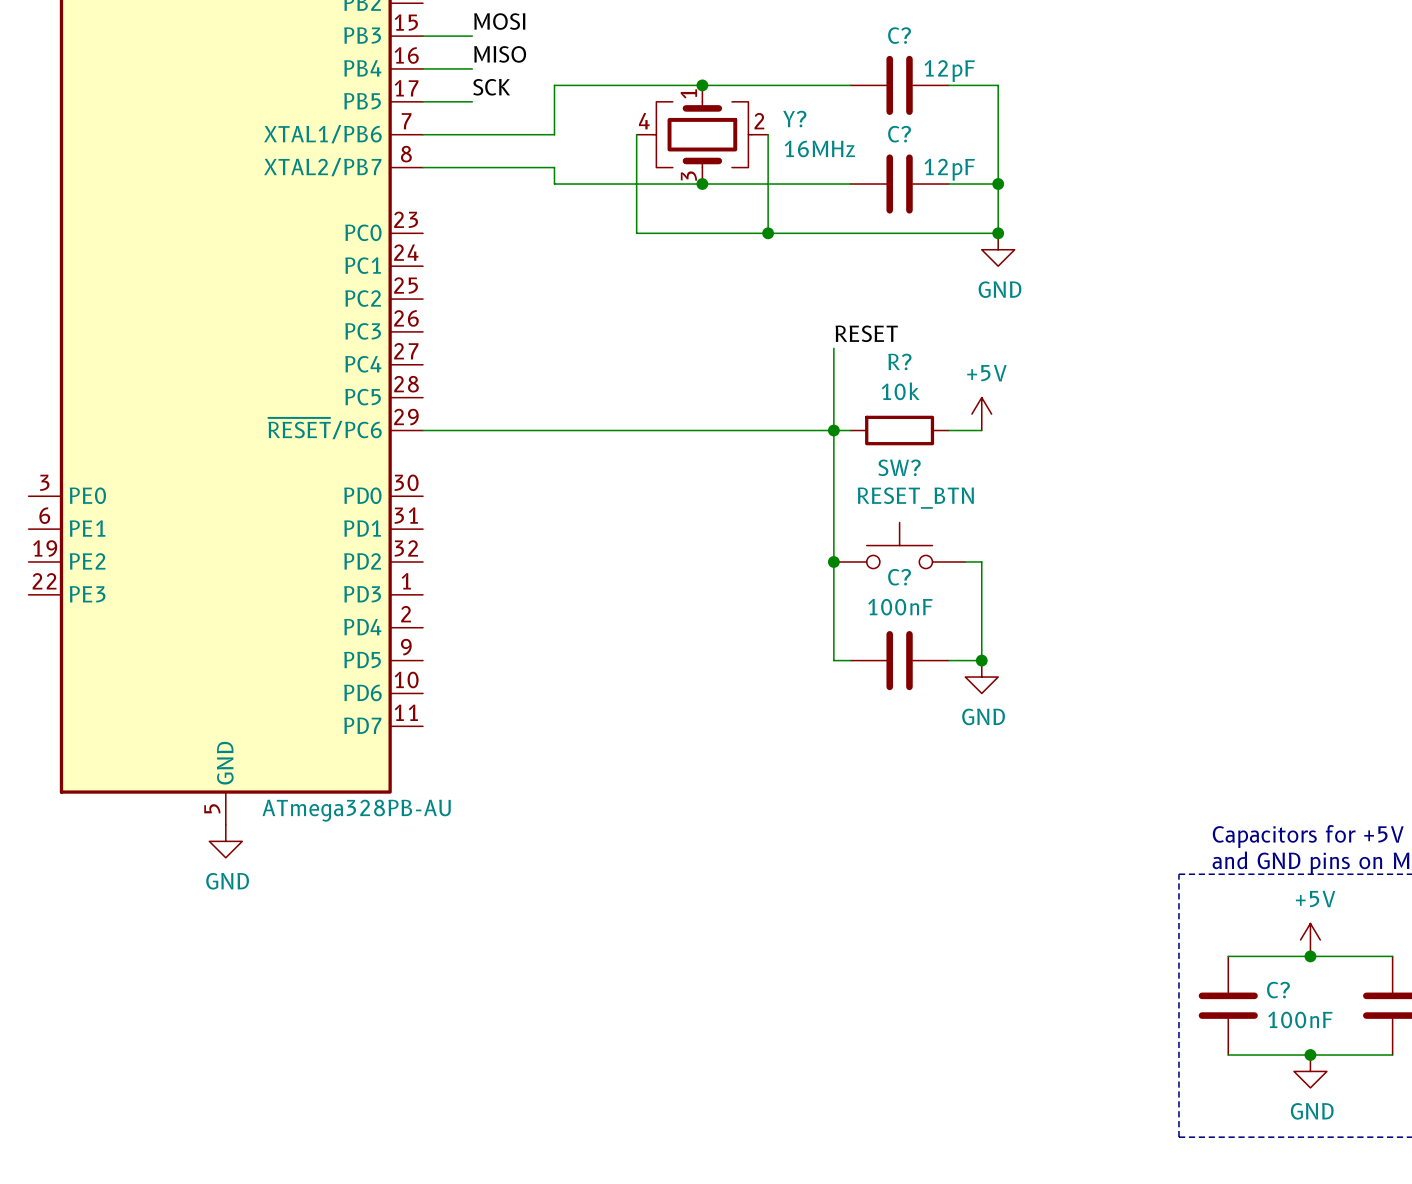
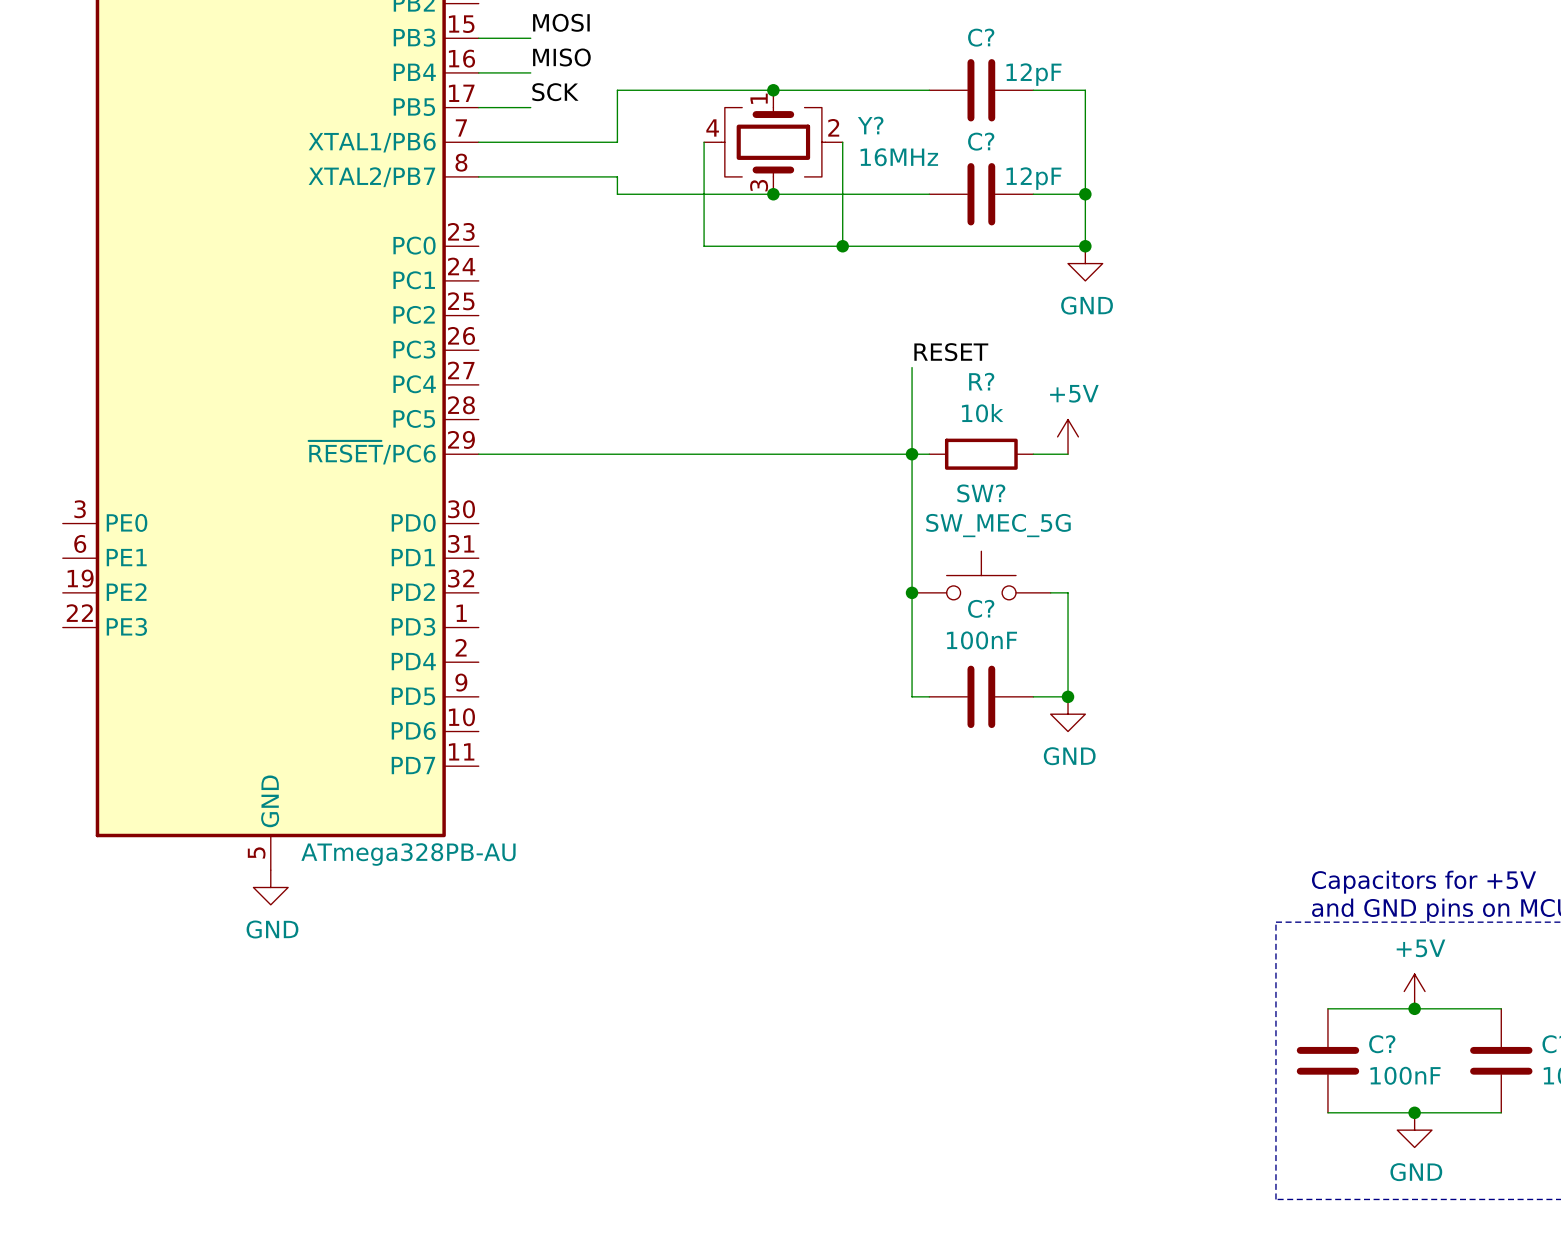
SW? value: RESET_BTN (915, 498) -> SW_MEC_5G (998, 525)

